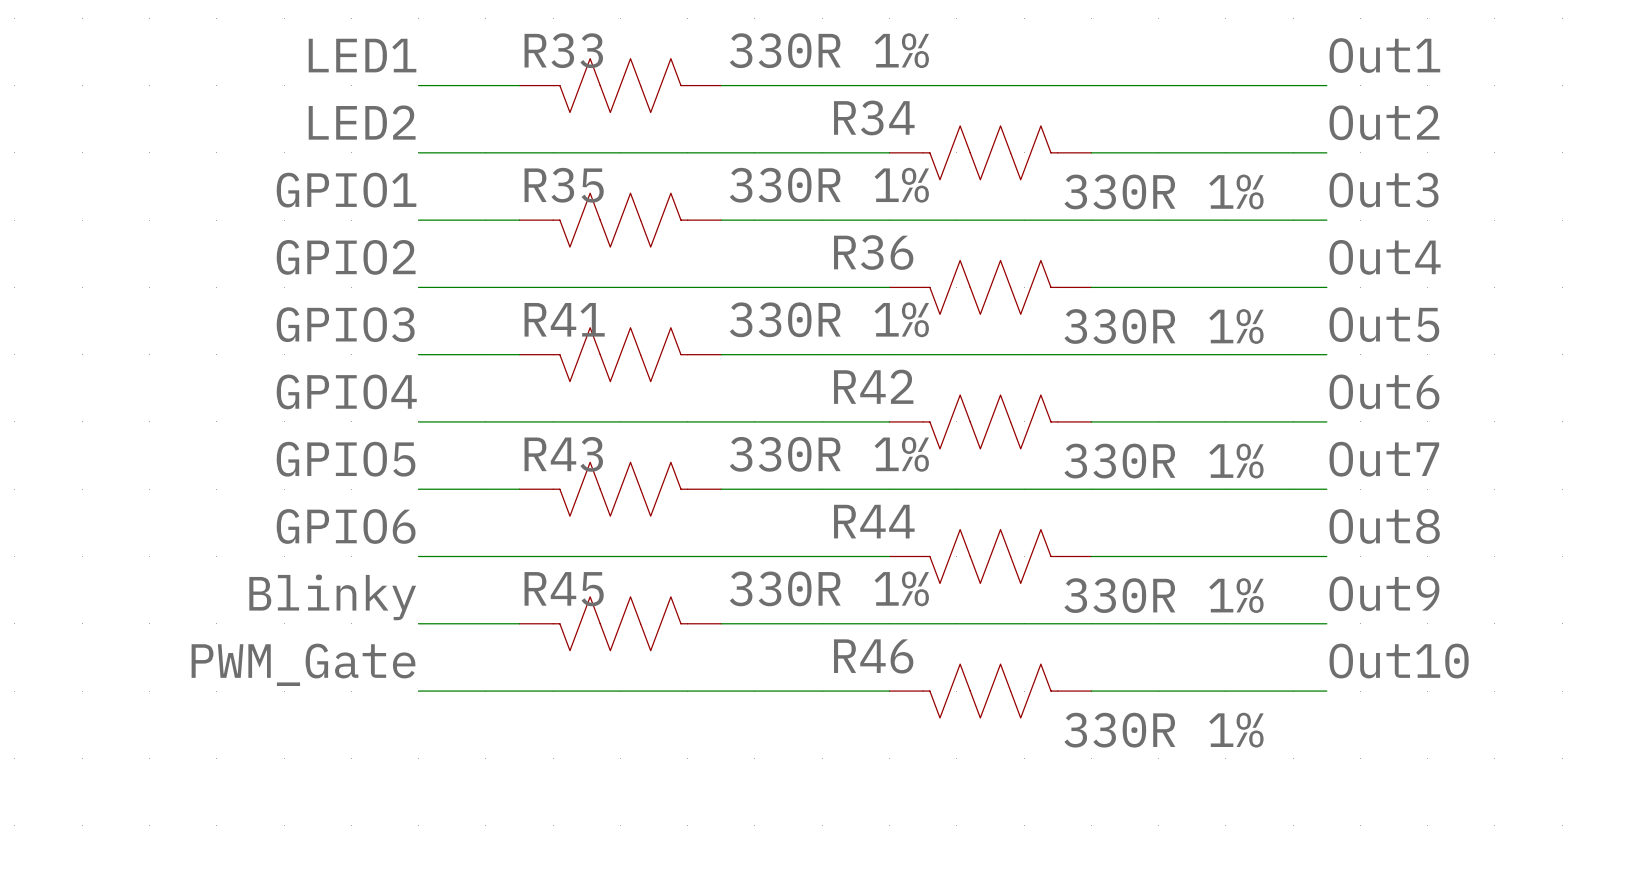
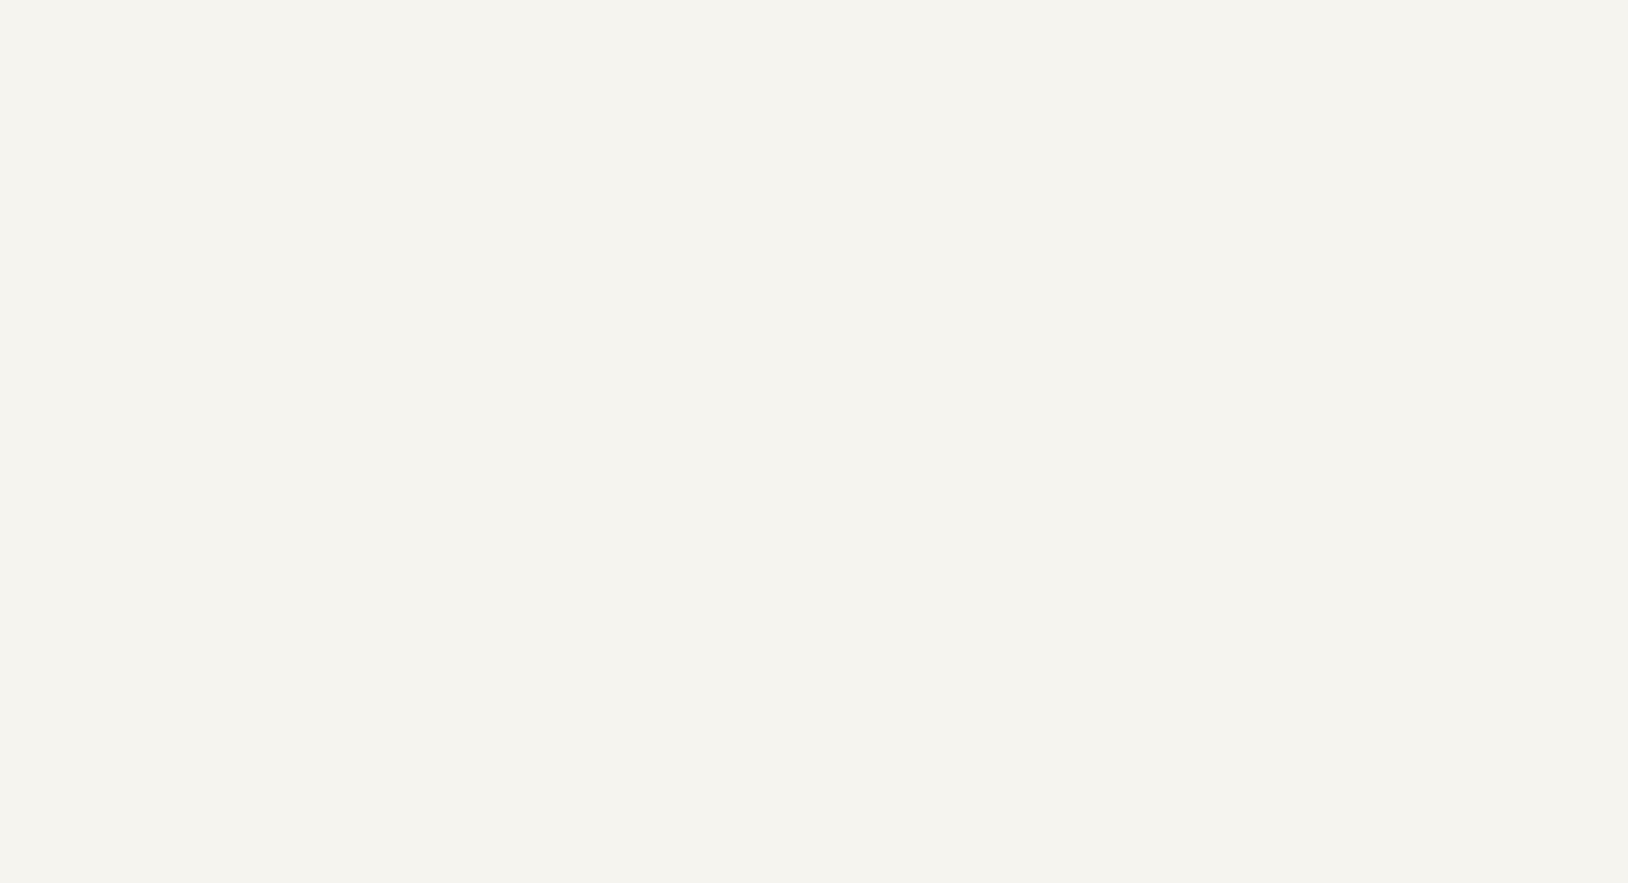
label: LED1 (362, 55) -> none
label: Out1 (1384, 55) -> none
wire: (418, 85) (519, 85) -> none
R33: 330R 1% (620, 85) -> none
wire: (721, 85) (1326, 85) -> none
label: LED2 (362, 122) -> none
label: Out2 (1384, 122) -> none
wire: (418, 152) (889, 152) -> none
R34: 330R 1% (990, 152) -> none
wire: (1091, 152) (1326, 152) -> none
label: GPIO1 (346, 190) -> none
label: Out3 (1384, 190) -> none
wire: (418, 220) (519, 220) -> none
R35: 330R 1% (620, 220) -> none
wire: (721, 220) (1326, 220) -> none
label: GPIO2 (346, 257) -> none
label: Out4 (1385, 257) -> none
wire: (418, 287) (889, 287) -> none
R36: 330R 1% (990, 287) -> none
wire: (1091, 287) (1326, 287) -> none
label: GPIO3 (345, 324) -> none
label: Out5 (1384, 324) -> none
wire: (418, 354) (519, 354) -> none
R41: 330R 1% (620, 354) -> none
wire: (721, 354) (1326, 354) -> none
label: GPIO4 (346, 391) -> none
label: Out6 (1384, 391) -> none
wire: (418, 421) (889, 421) -> none
R42: 330R 1% (990, 421) -> none
wire: (1091, 421) (1326, 421) -> none
label: GPIO5 (346, 459) -> none
label: Out7 (1384, 459) -> none
wire: (418, 489) (519, 489) -> none
R43: 330R 1% (620, 489) -> none
wire: (721, 489) (1326, 489) -> none
label: GPIO6 (346, 526) -> none
label: Out8 (1384, 526) -> none
wire: (418, 556) (889, 556) -> none
R44: 330R 1% (990, 556) -> none
wire: (1091, 556) (1326, 556) -> none
label: Out9 (1384, 593) -> none
label: Blinky (332, 597) -> none
wire: (418, 623) (519, 623) -> none
R45: 330R 1% (620, 623) -> none
wire: (721, 623) (1326, 623) -> none
label: Out10 (1399, 661) -> none
label: PWM_Gate (303, 664) -> none
wire: (418, 691) (889, 691) -> none
R46: 330R 1% (990, 691) -> none
wire: (1091, 691) (1326, 691) -> none

